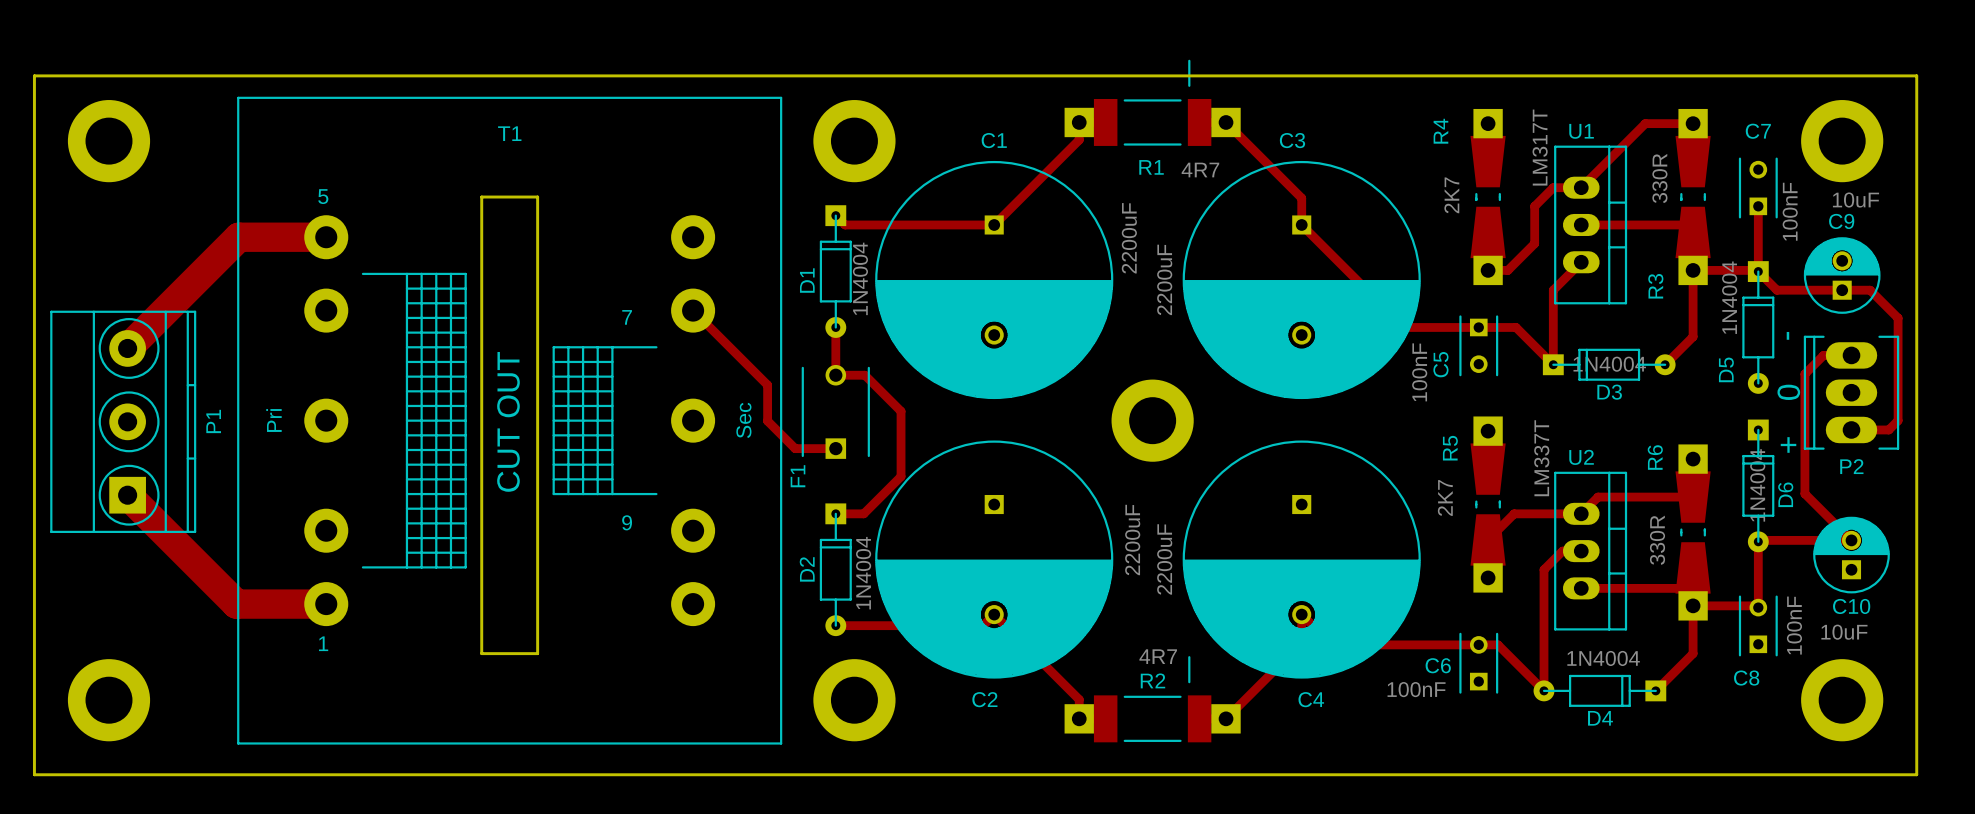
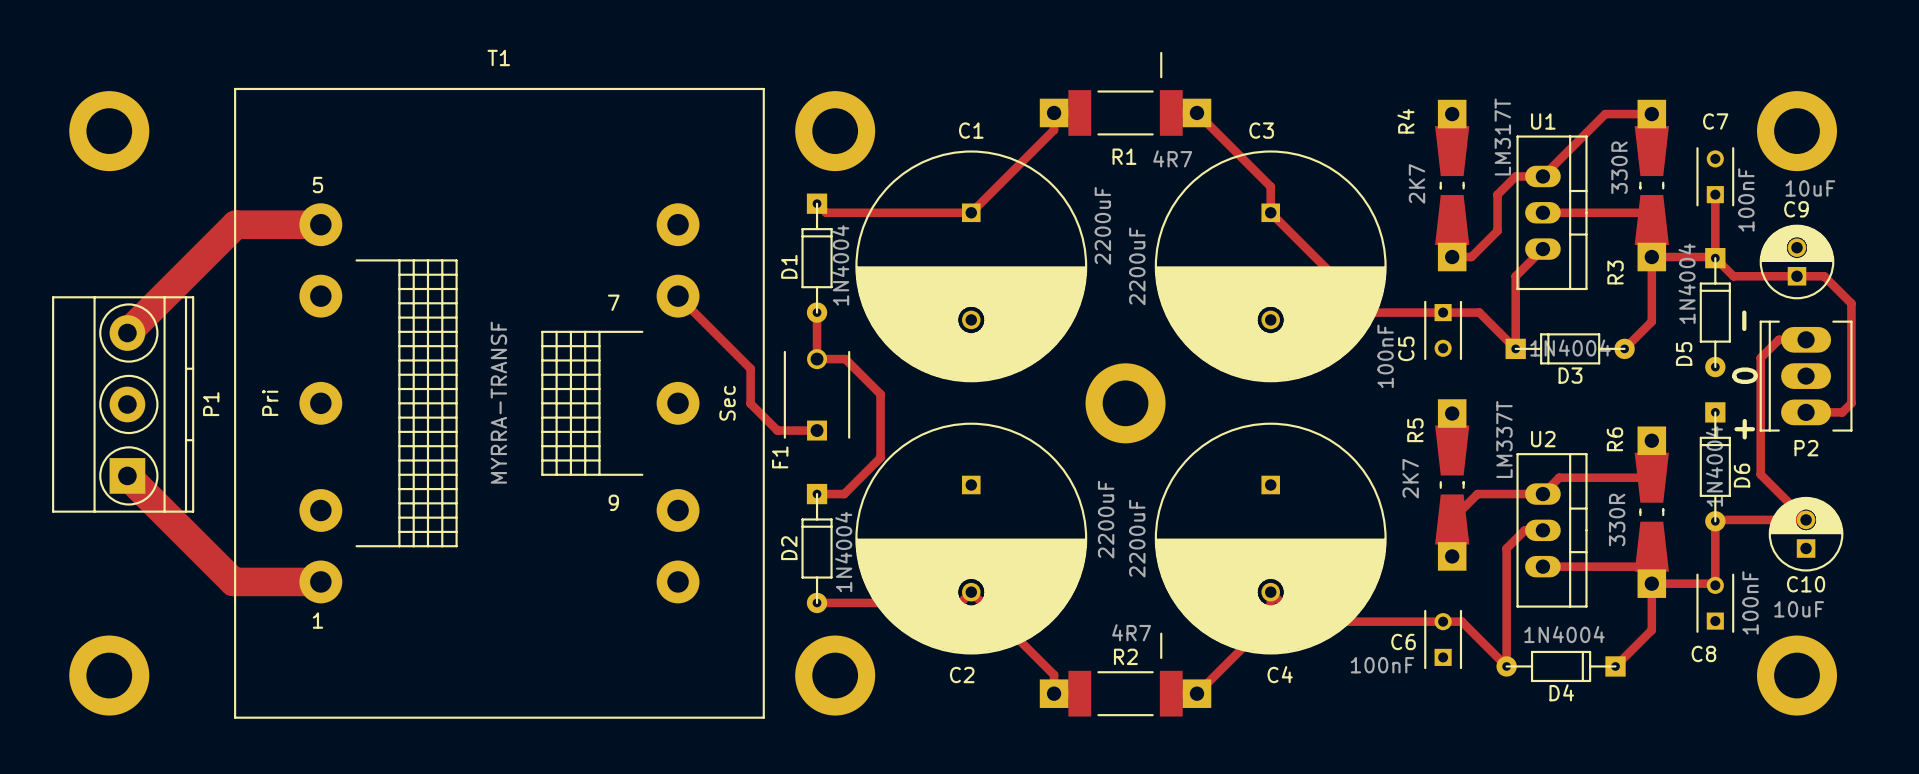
board edge: (34, 75) (34, 774) (1916, 774) (1916, 75) (34, 75) -> none
T1 name position: T1 (509, 133) -> T1 (498, 57)
board edge: (481, 197) (537, 197) (537, 653) (481, 653) (481, 197) -> none
T1 value: none -> MYRRA-TRANSF (498, 402)
text: CUT OUT (508, 421) -> none

